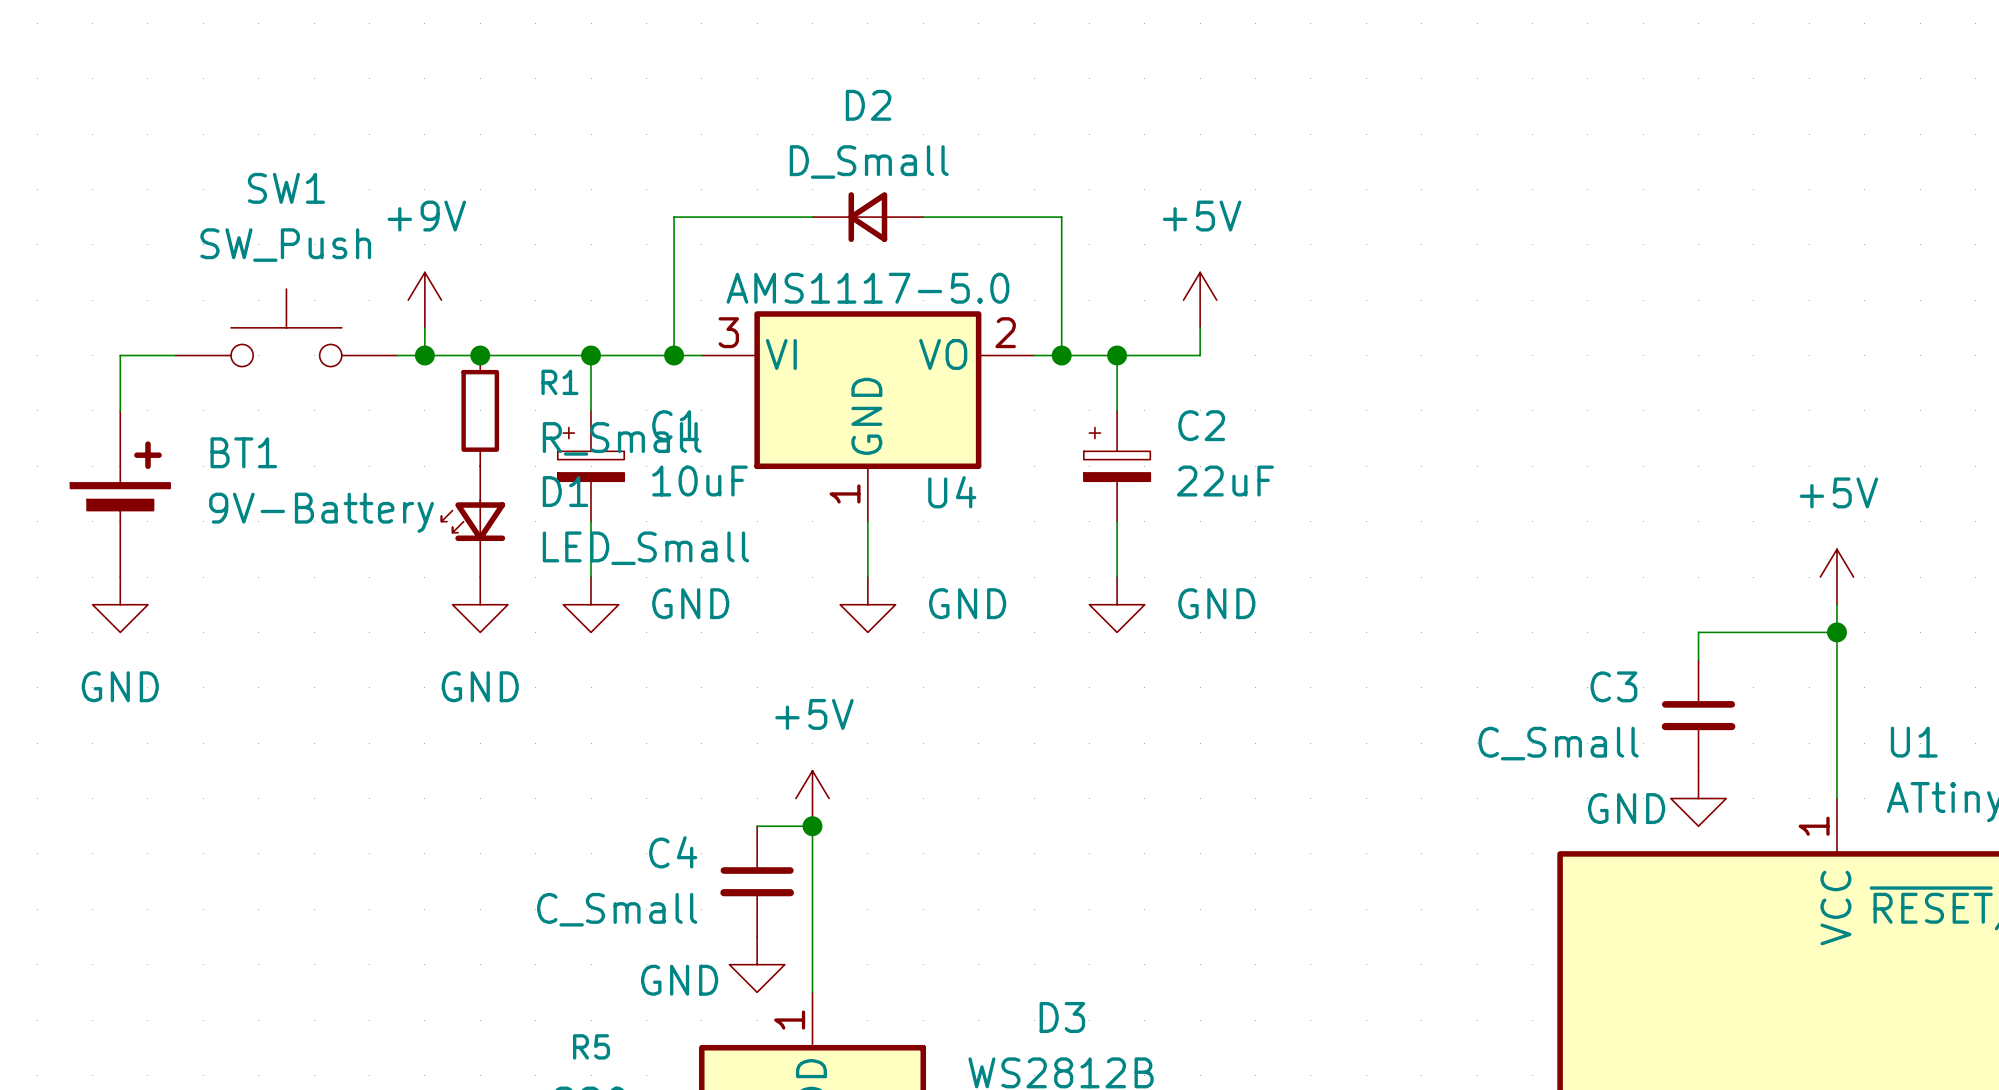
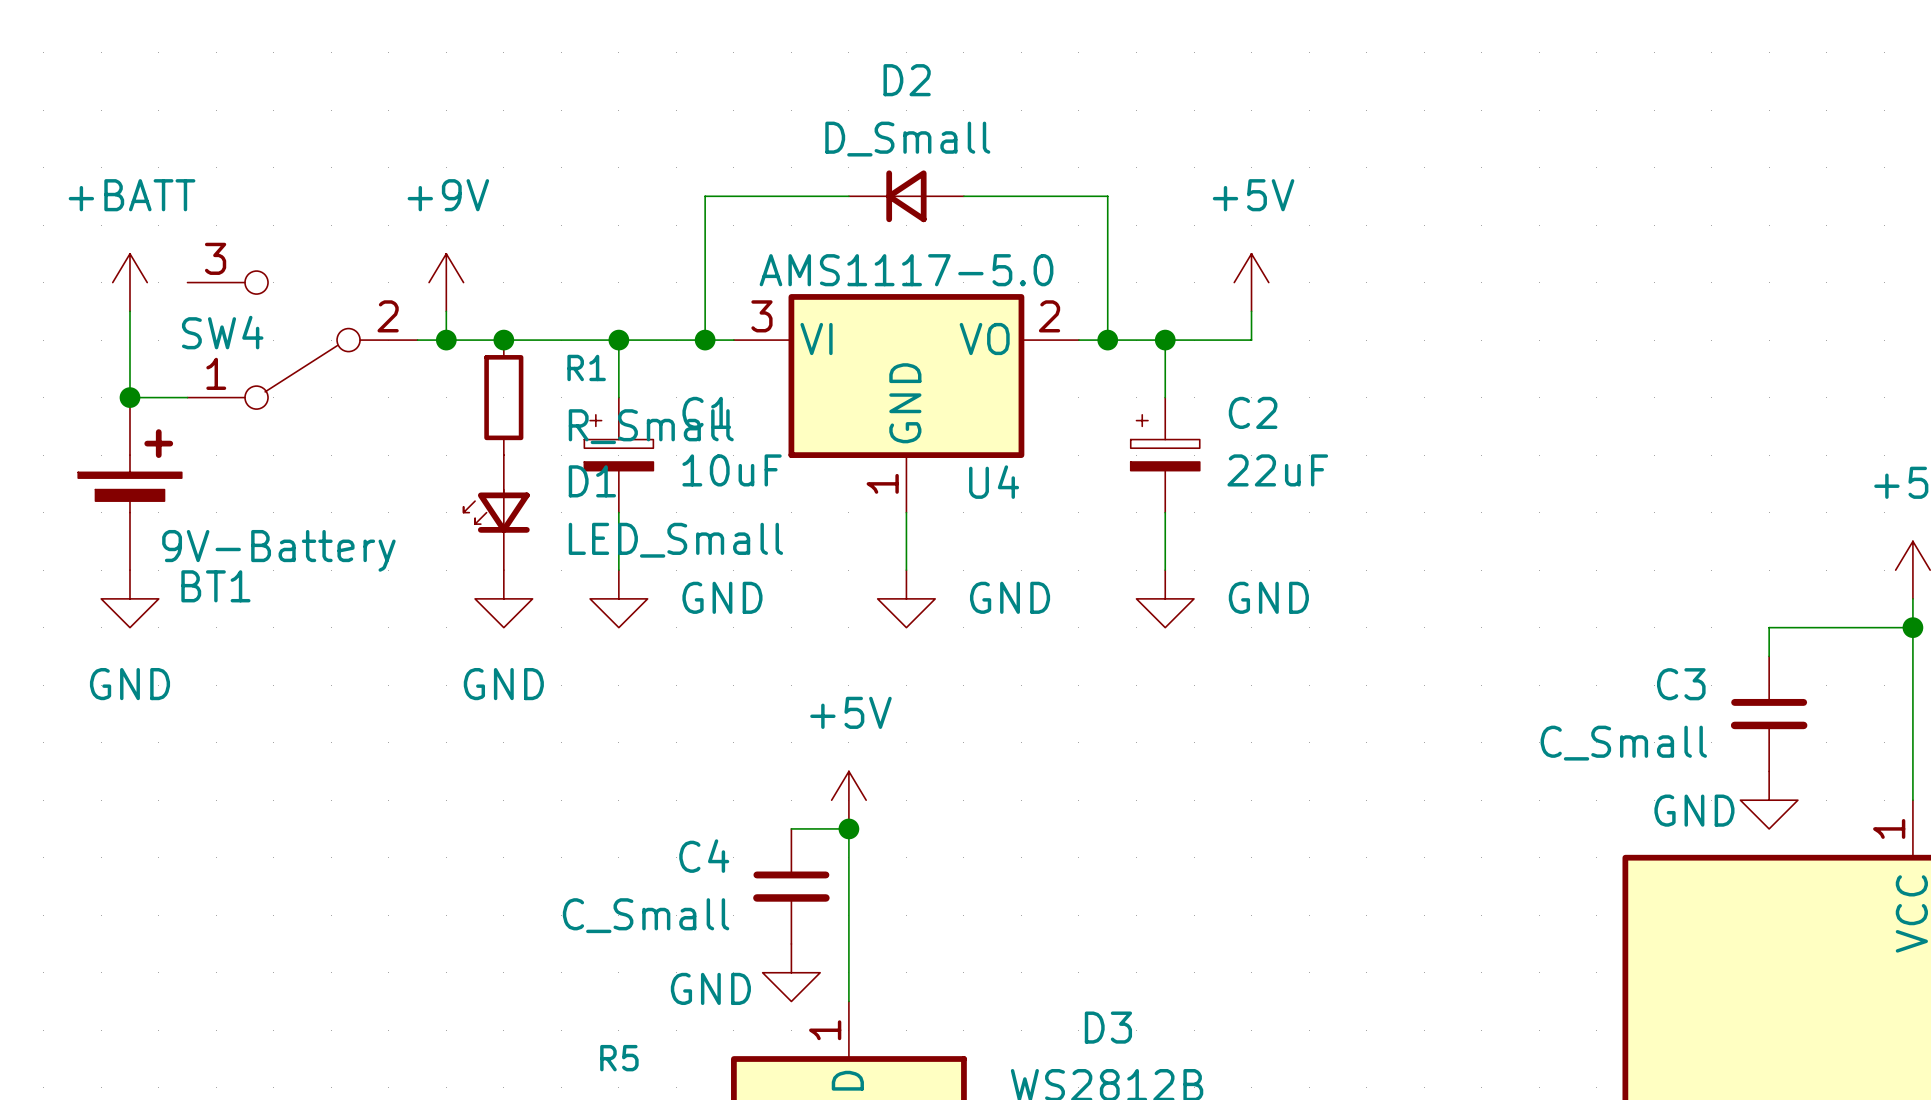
power symbol: none -> +BATT (129, 282)
SW1: SW_Push (286, 327) -> none
wire: (120, 355) (175, 355) -> (129, 340) (129, 311)
SW4: none -> (302, 340)
wire: none -> (129, 397) (187, 397)
junction: none -> (129, 397)
BT1 name position: BT1 (243, 452) -> BT1 (215, 586)
BT1 value position: 9V-Battery (321, 512) -> 9V-Battery (278, 550)

